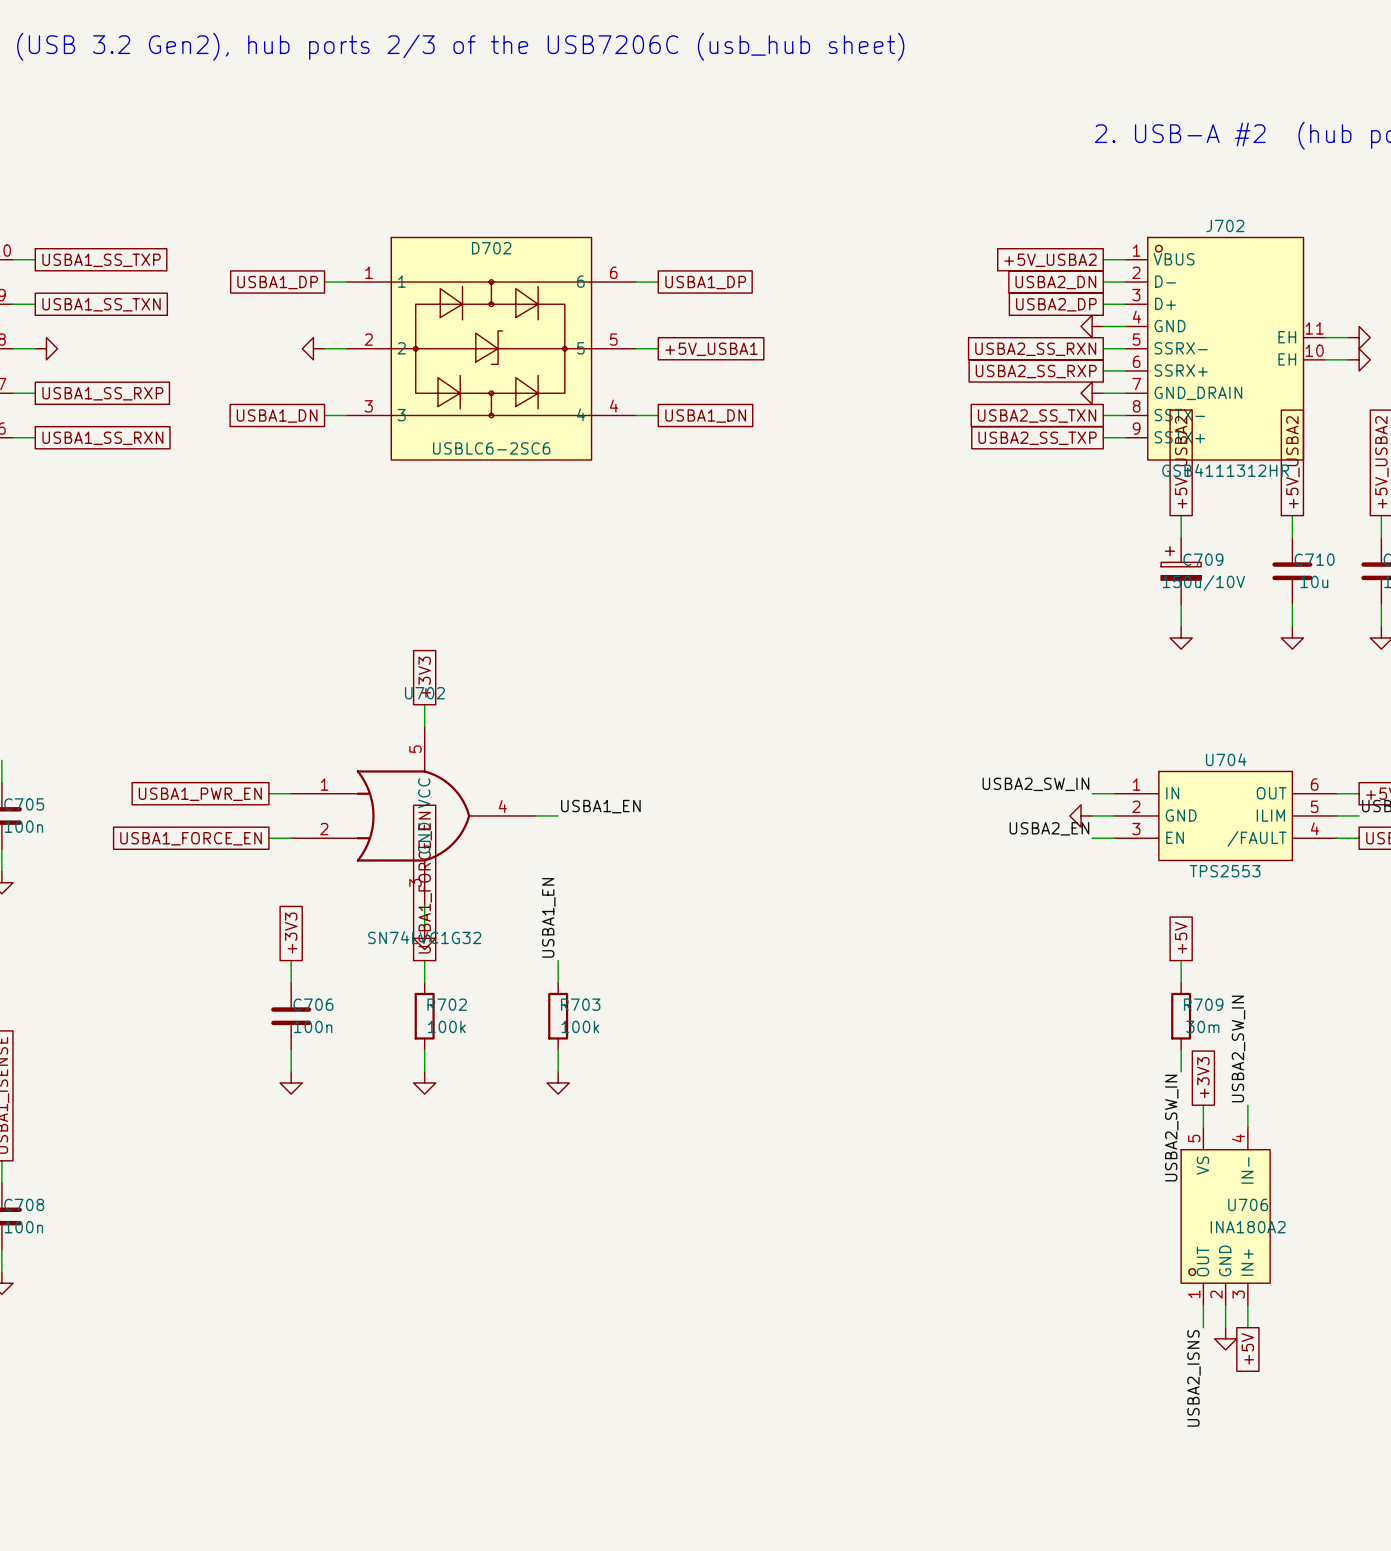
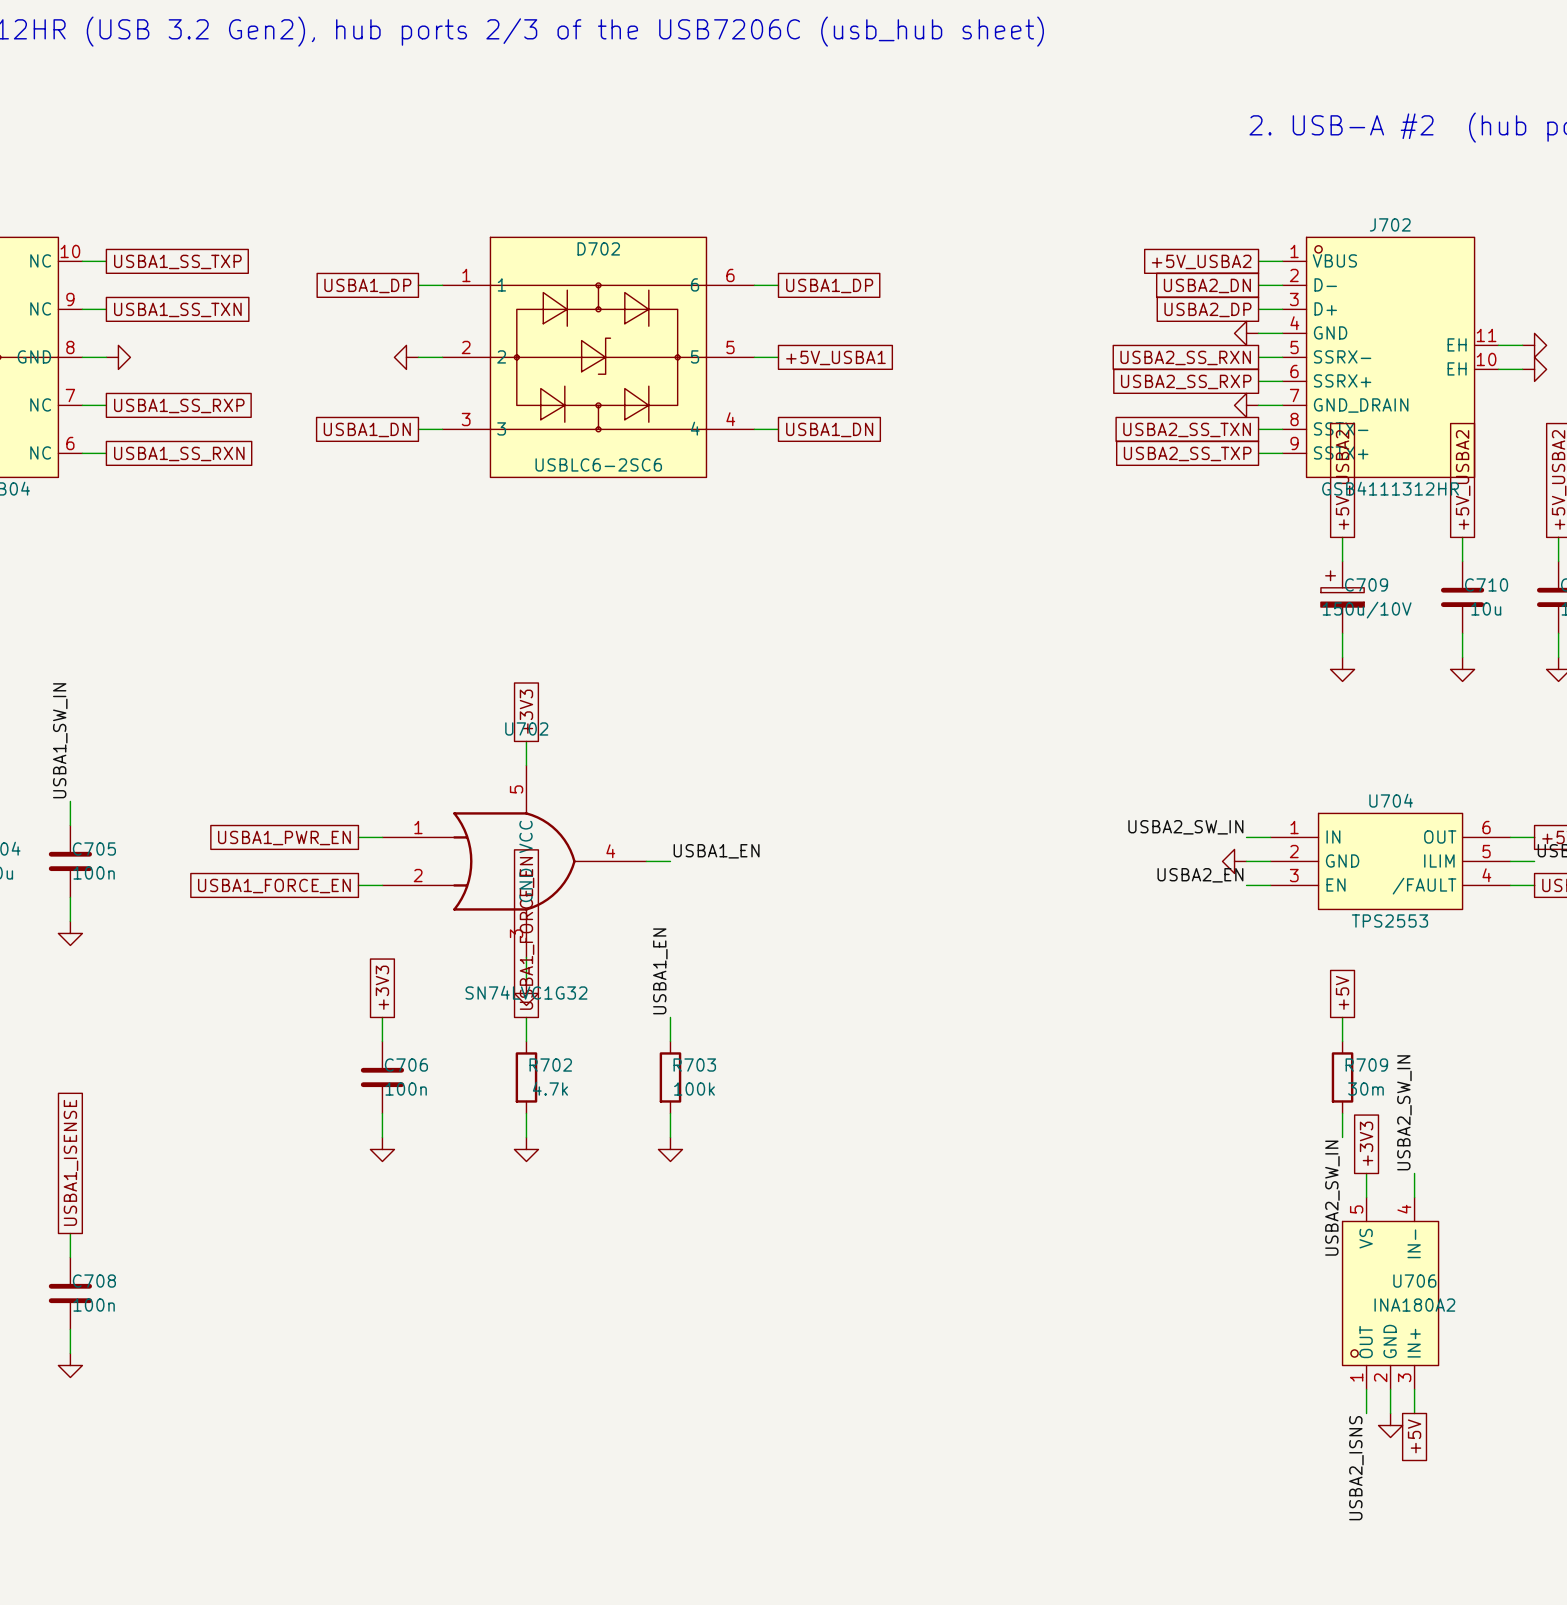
R702 value: 100k (446, 1026) -> 4.7k (550, 1088)

